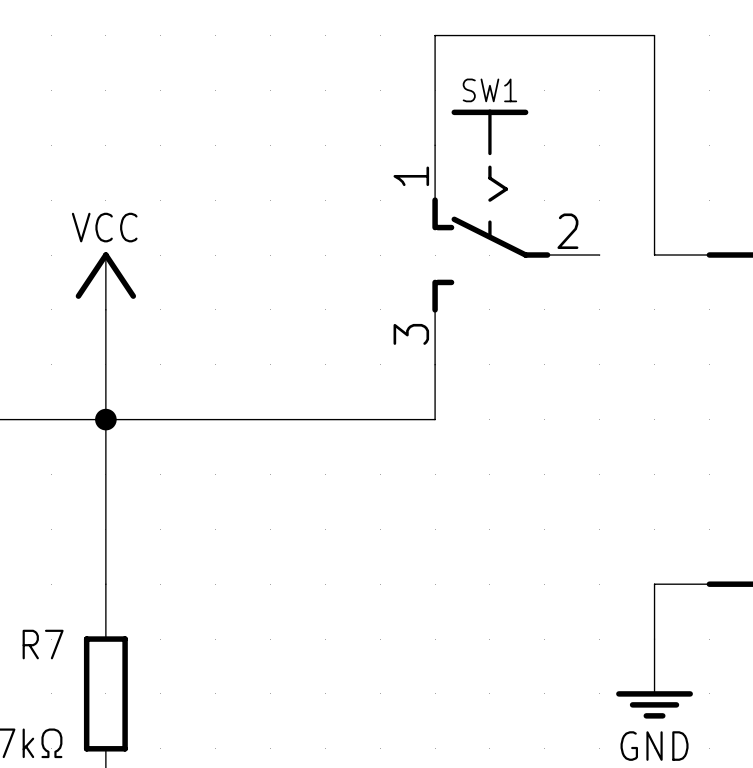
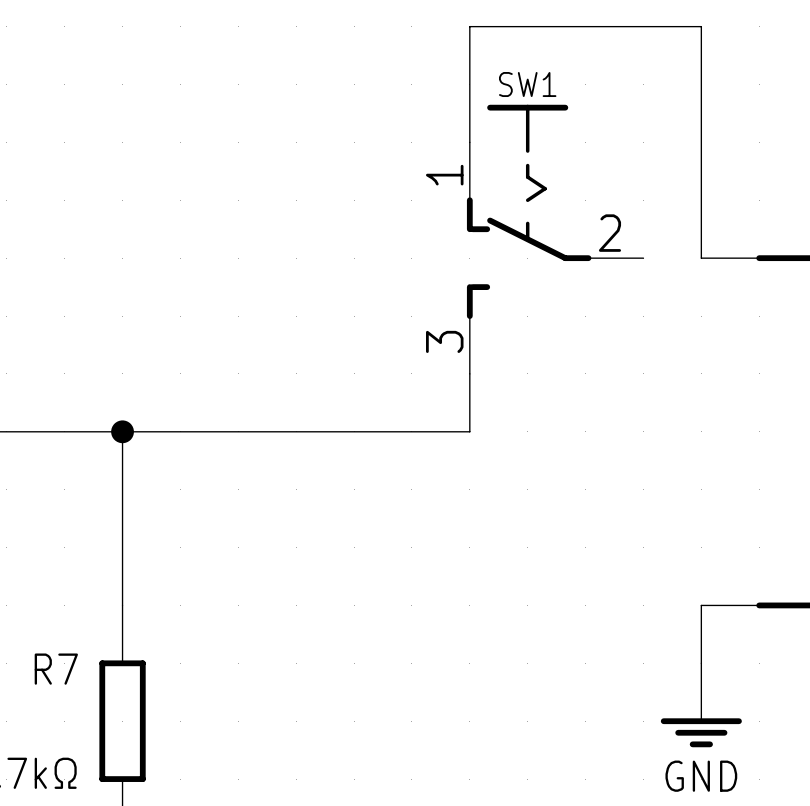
power symbol: VCC (105, 281) -> none
wire: (105, 309) (105, 419) -> none

